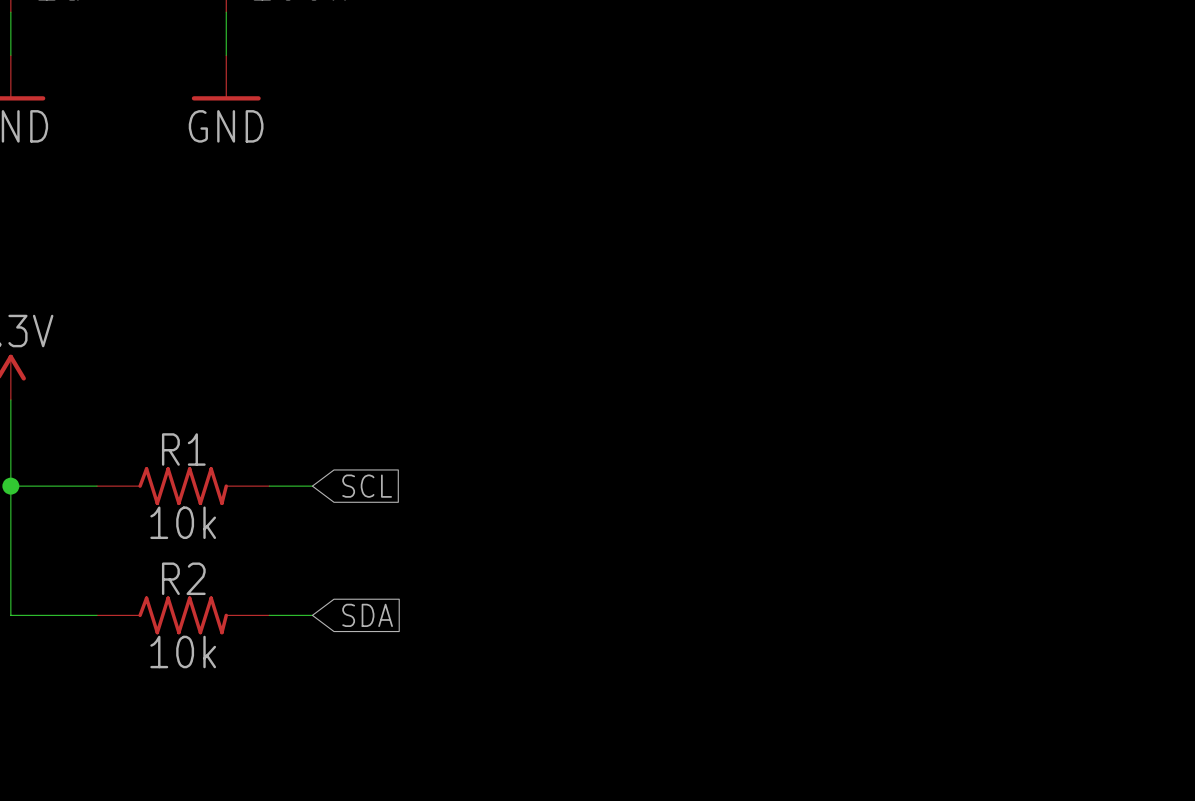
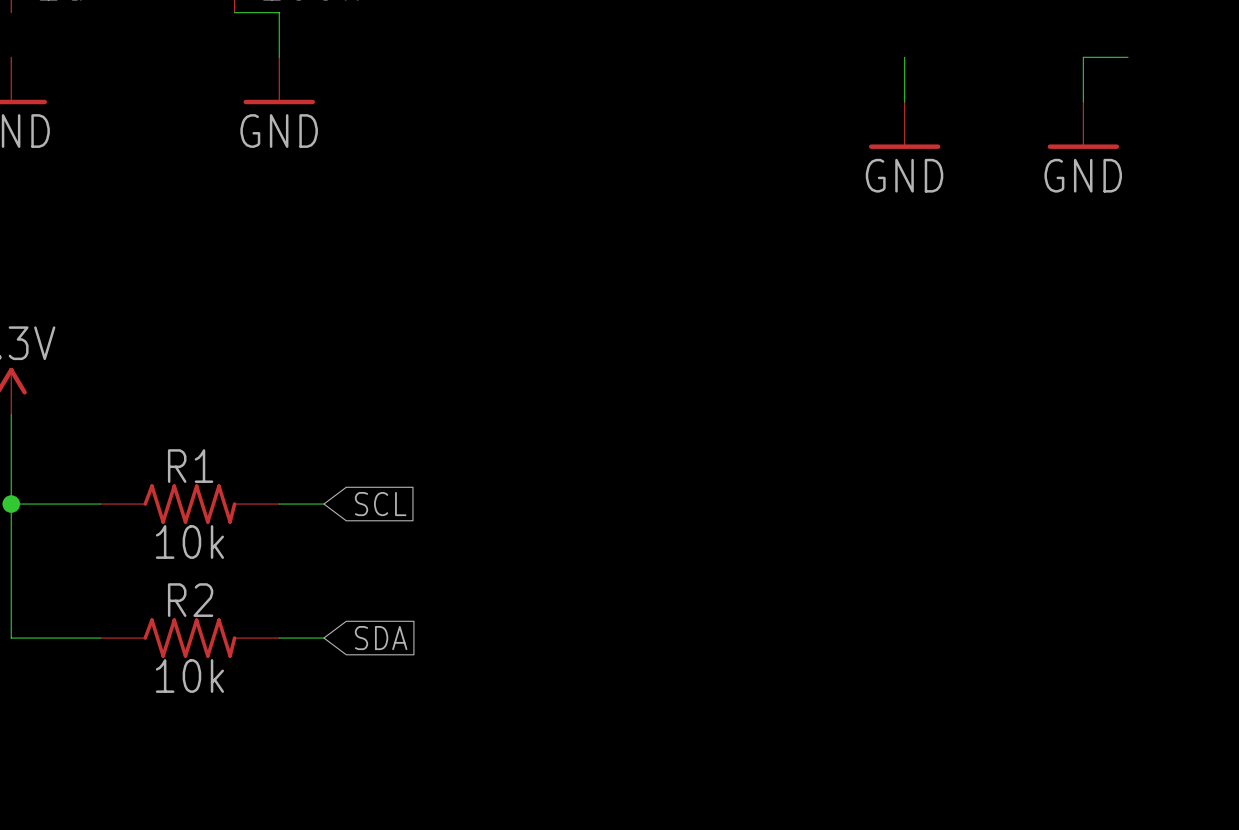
wire: (10, 12) (10, 55) -> none
wire: (226, 12) (226, 55) -> (234, 12) (279, 12) (279, 57)
wire: none -> (904, 57) (904, 102)
wire: none -> (1128, 57) (1083, 57) (1083, 102)
power symbol position: GND (226, 77) -> GND (279, 80)
power symbol: none -> GND (904, 125)
power symbol: none -> GND (1083, 125)

